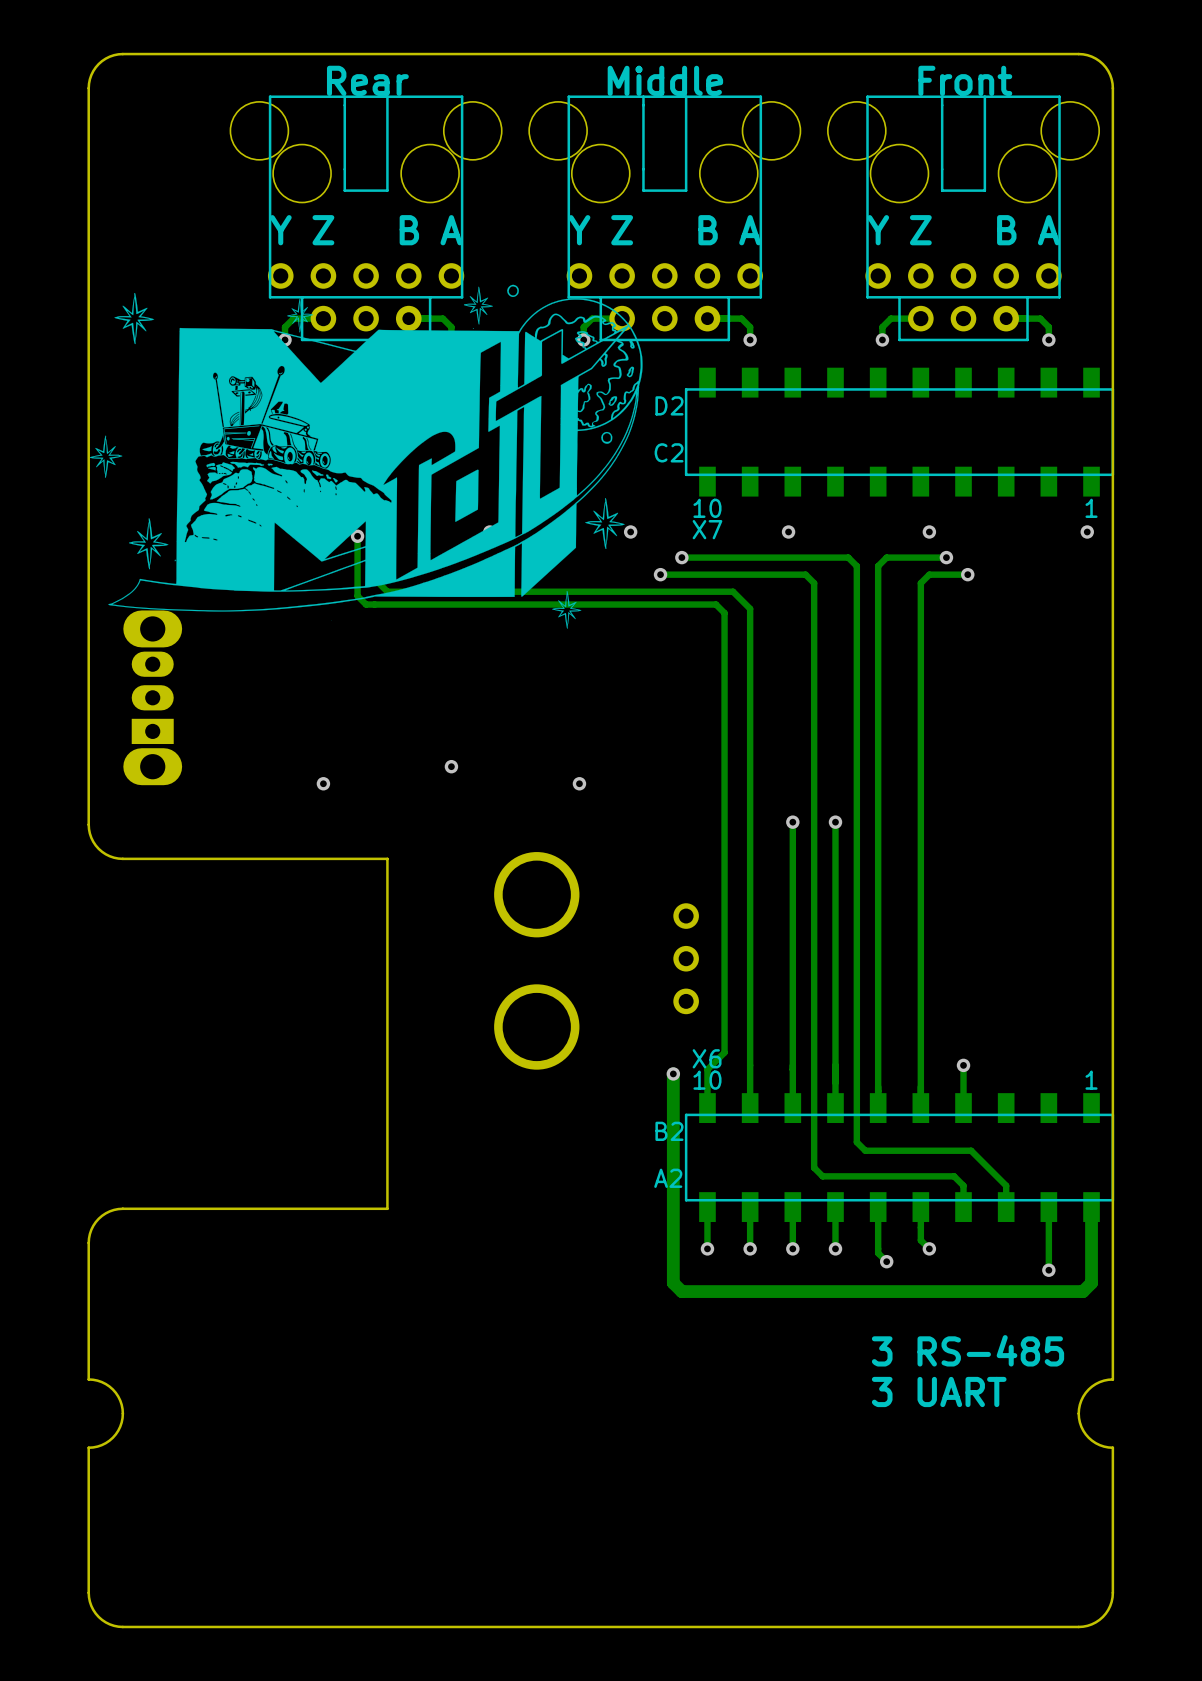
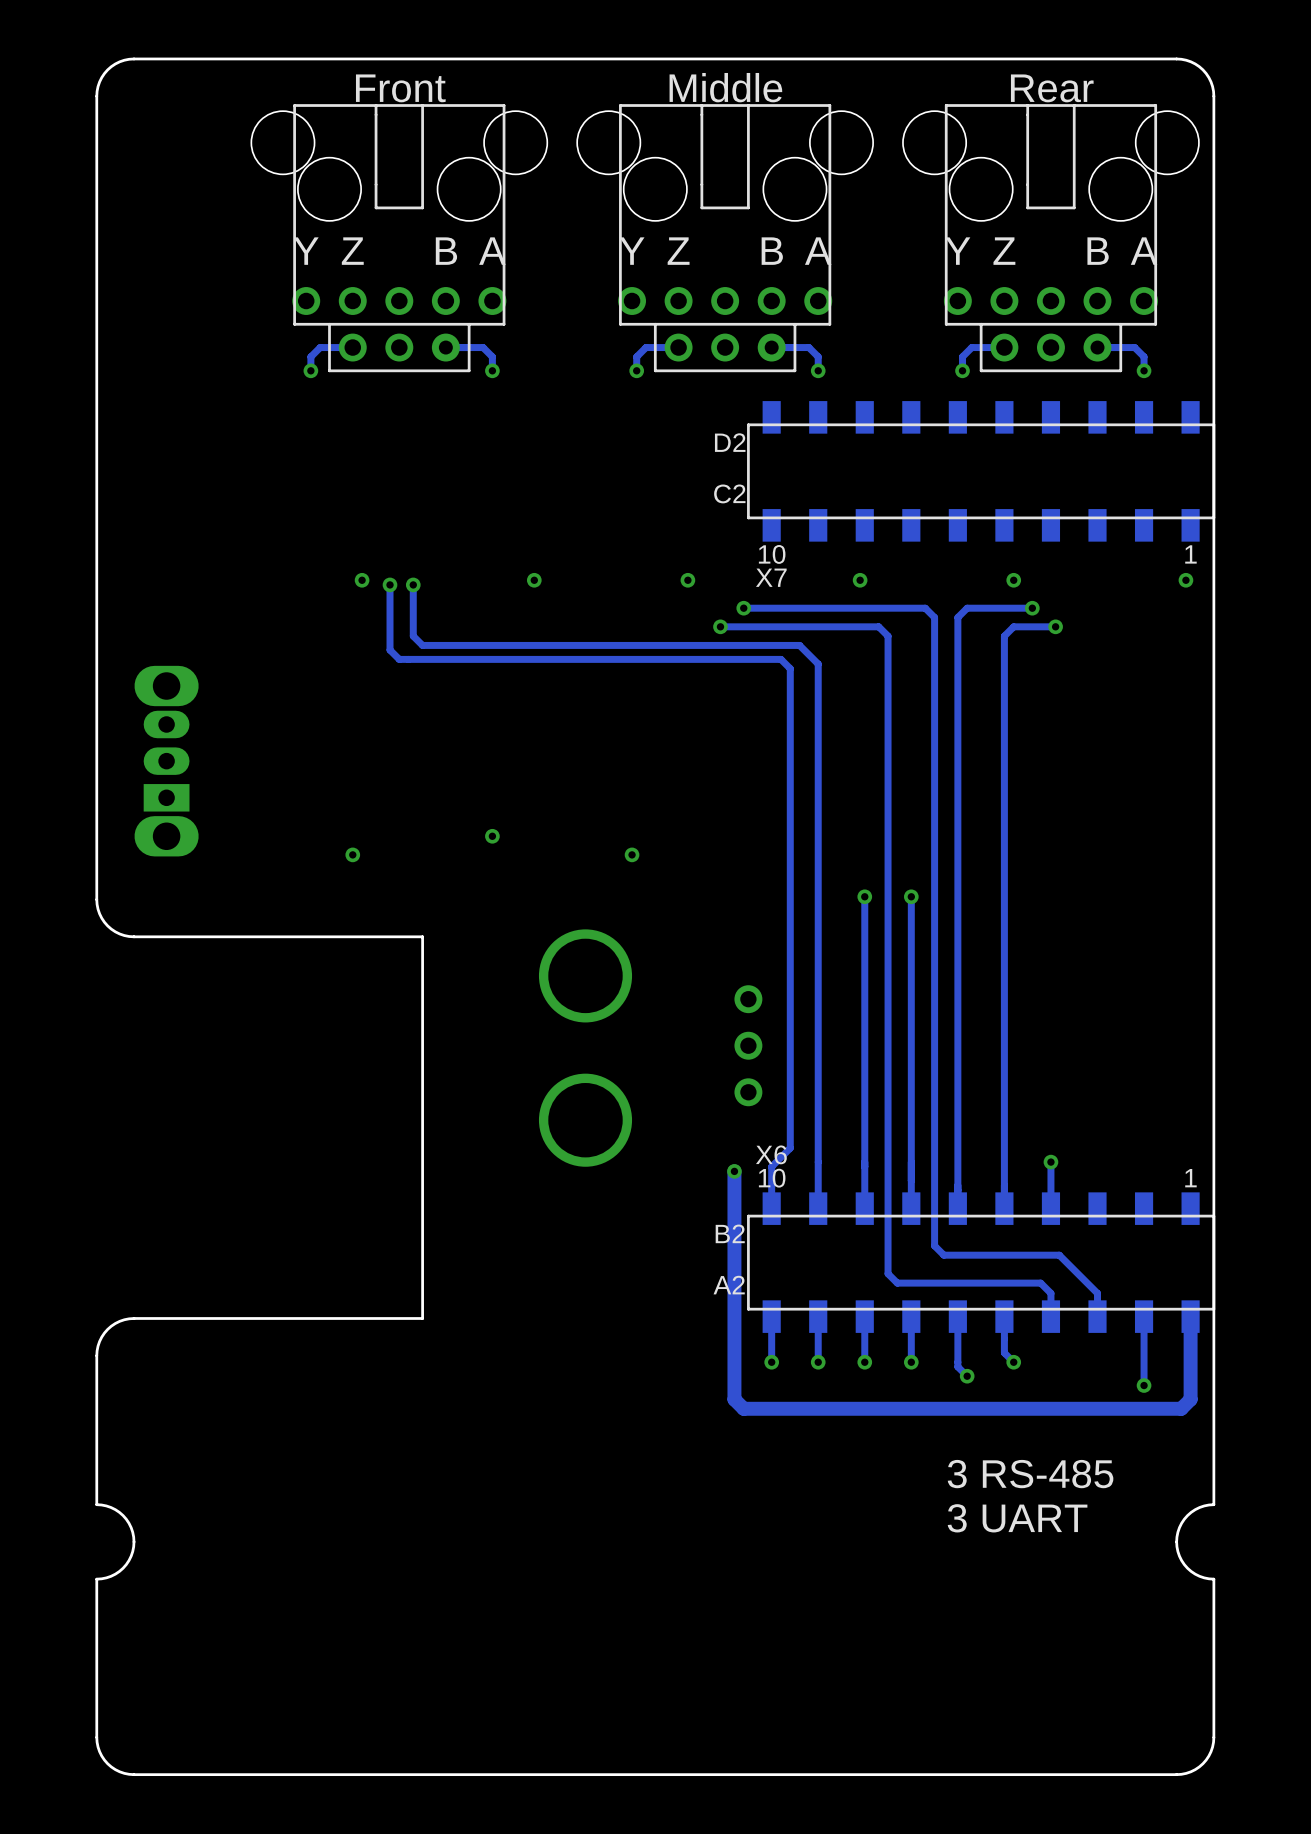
text: Rear (367, 80) -> Front (400, 88)
text: Front (965, 80) -> Rear (1052, 88)
drawing: [89, 284, 643, 629] -> none

